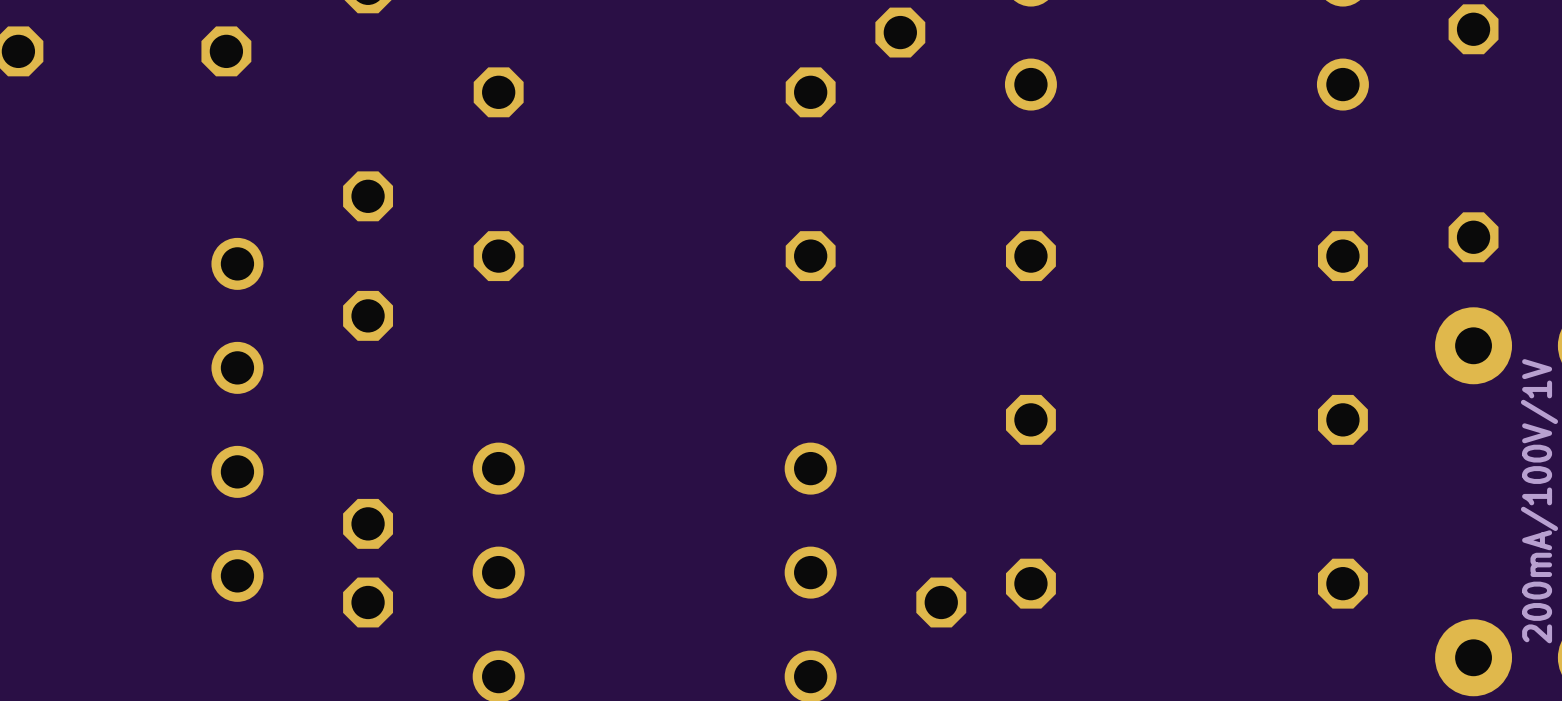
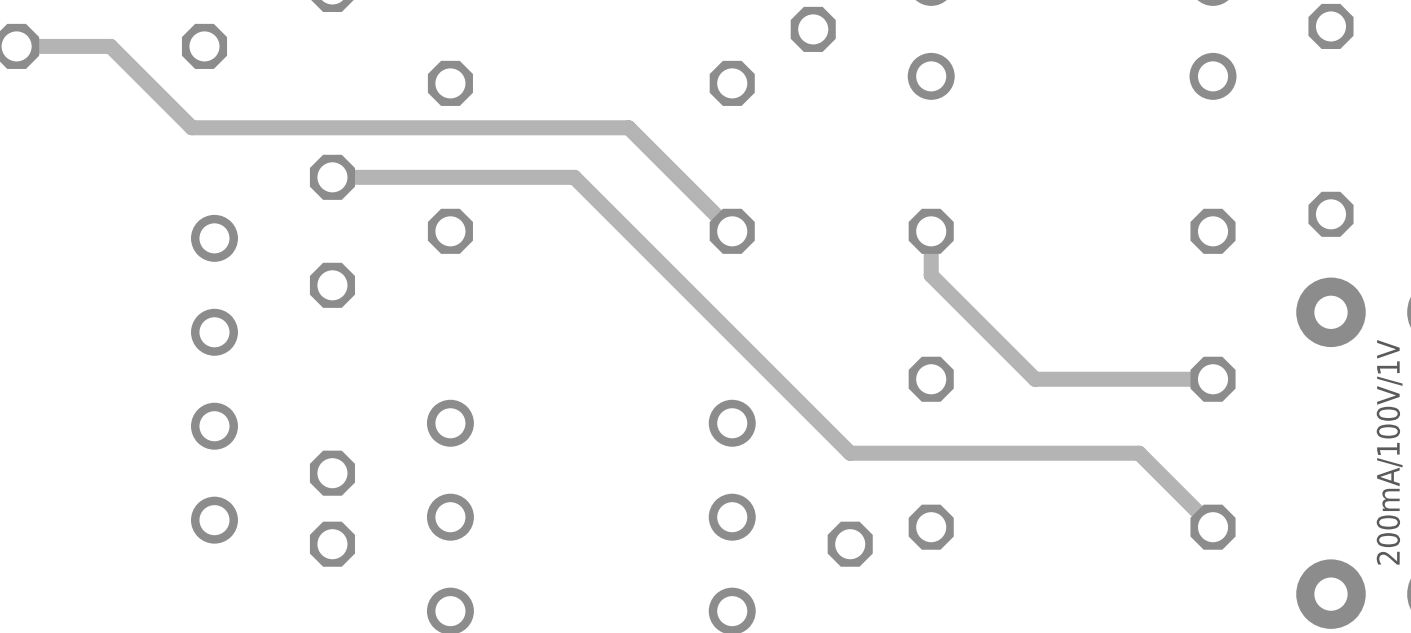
track: none -> (16, 46) (110, 46) (191, 127) (628, 127) (732, 231)
track: none -> (332, 177) (574, 177) (850, 453) (1139, 453) (1213, 527)
track: none -> (931, 231) (931, 275) (1035, 379) (1213, 379)

